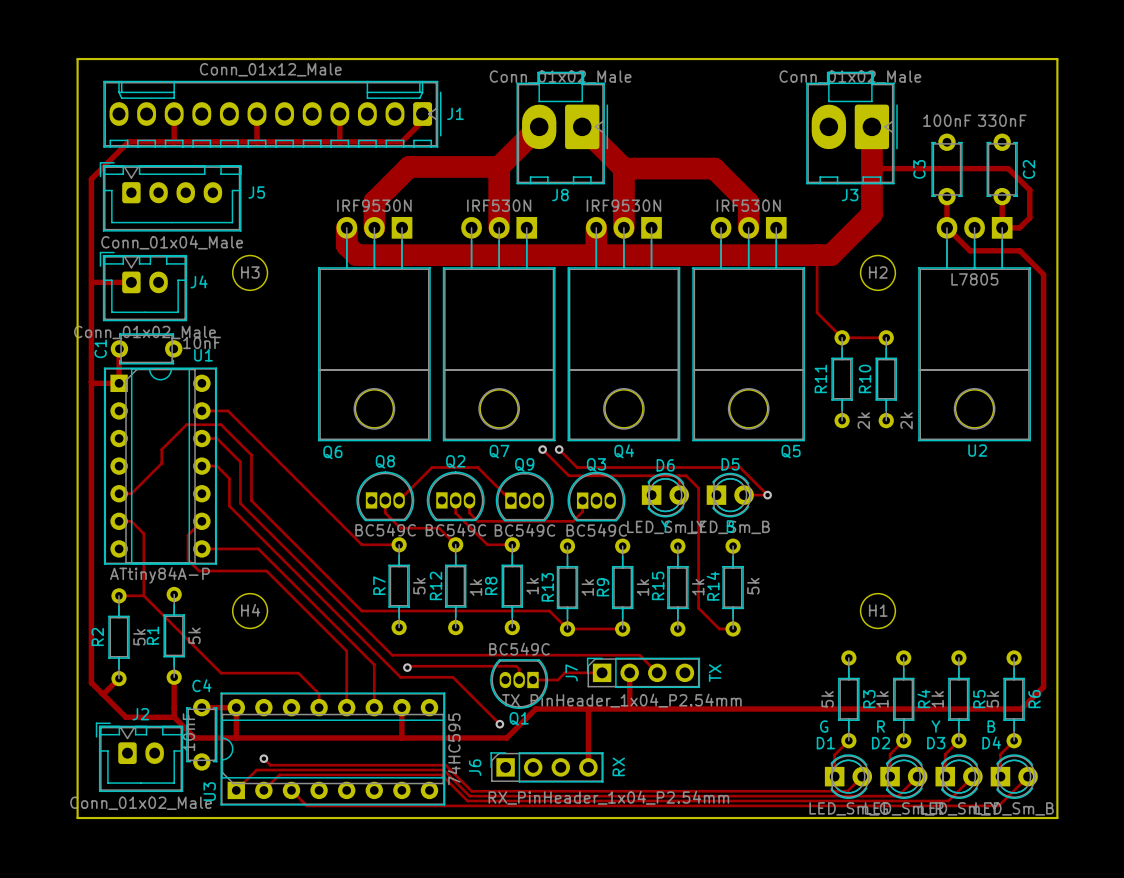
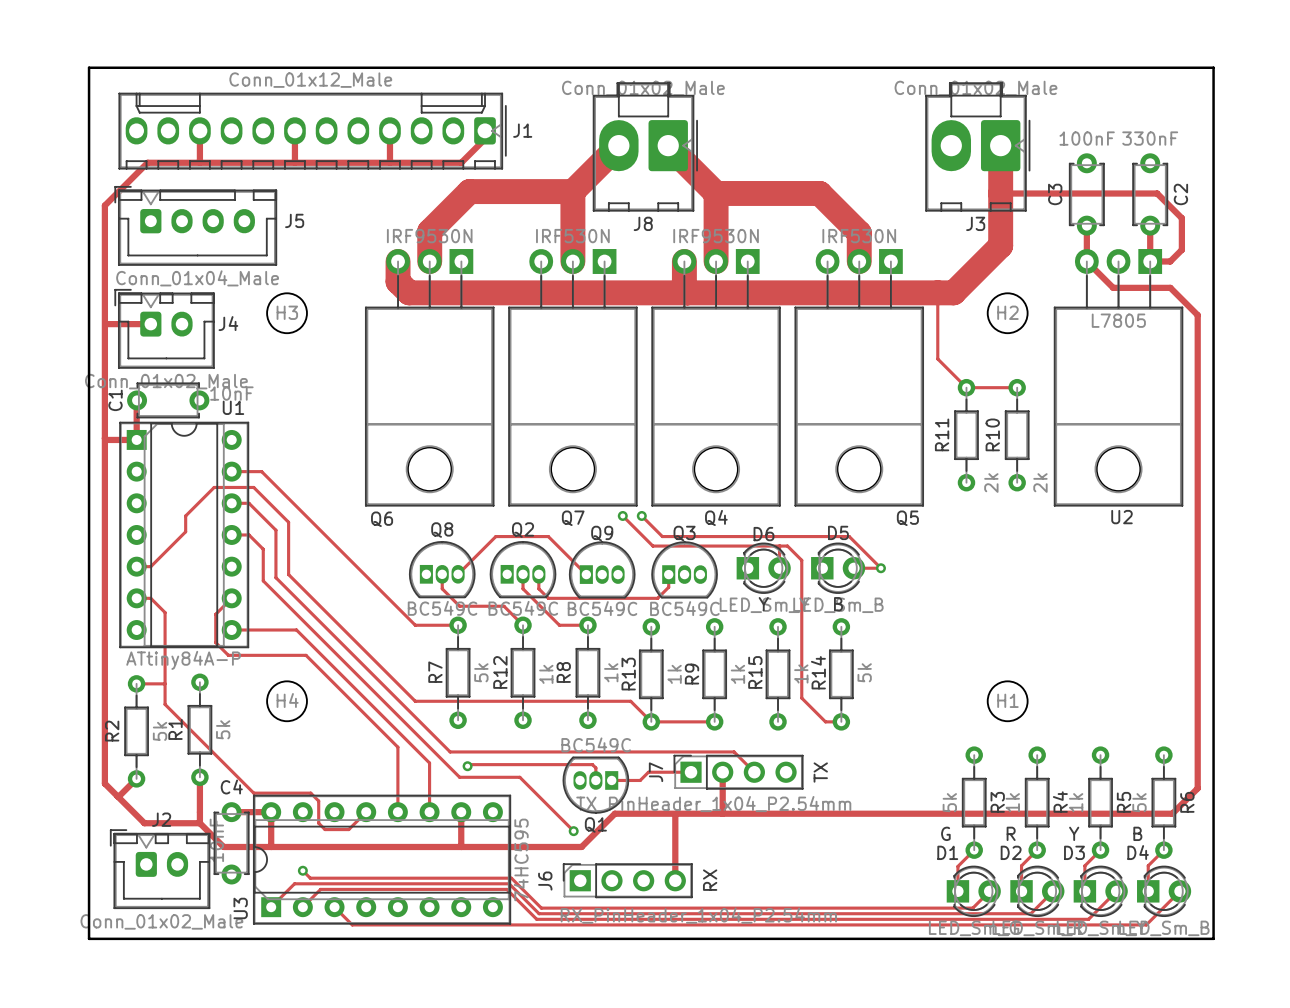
track: (143, 595) (221, 673) (298, 673) (319, 693) (319, 707) -> (165, 683) (165, 704) (253, 793) (310, 793) (318, 801) (318, 823) (325, 829) (348, 829) (366, 812)

